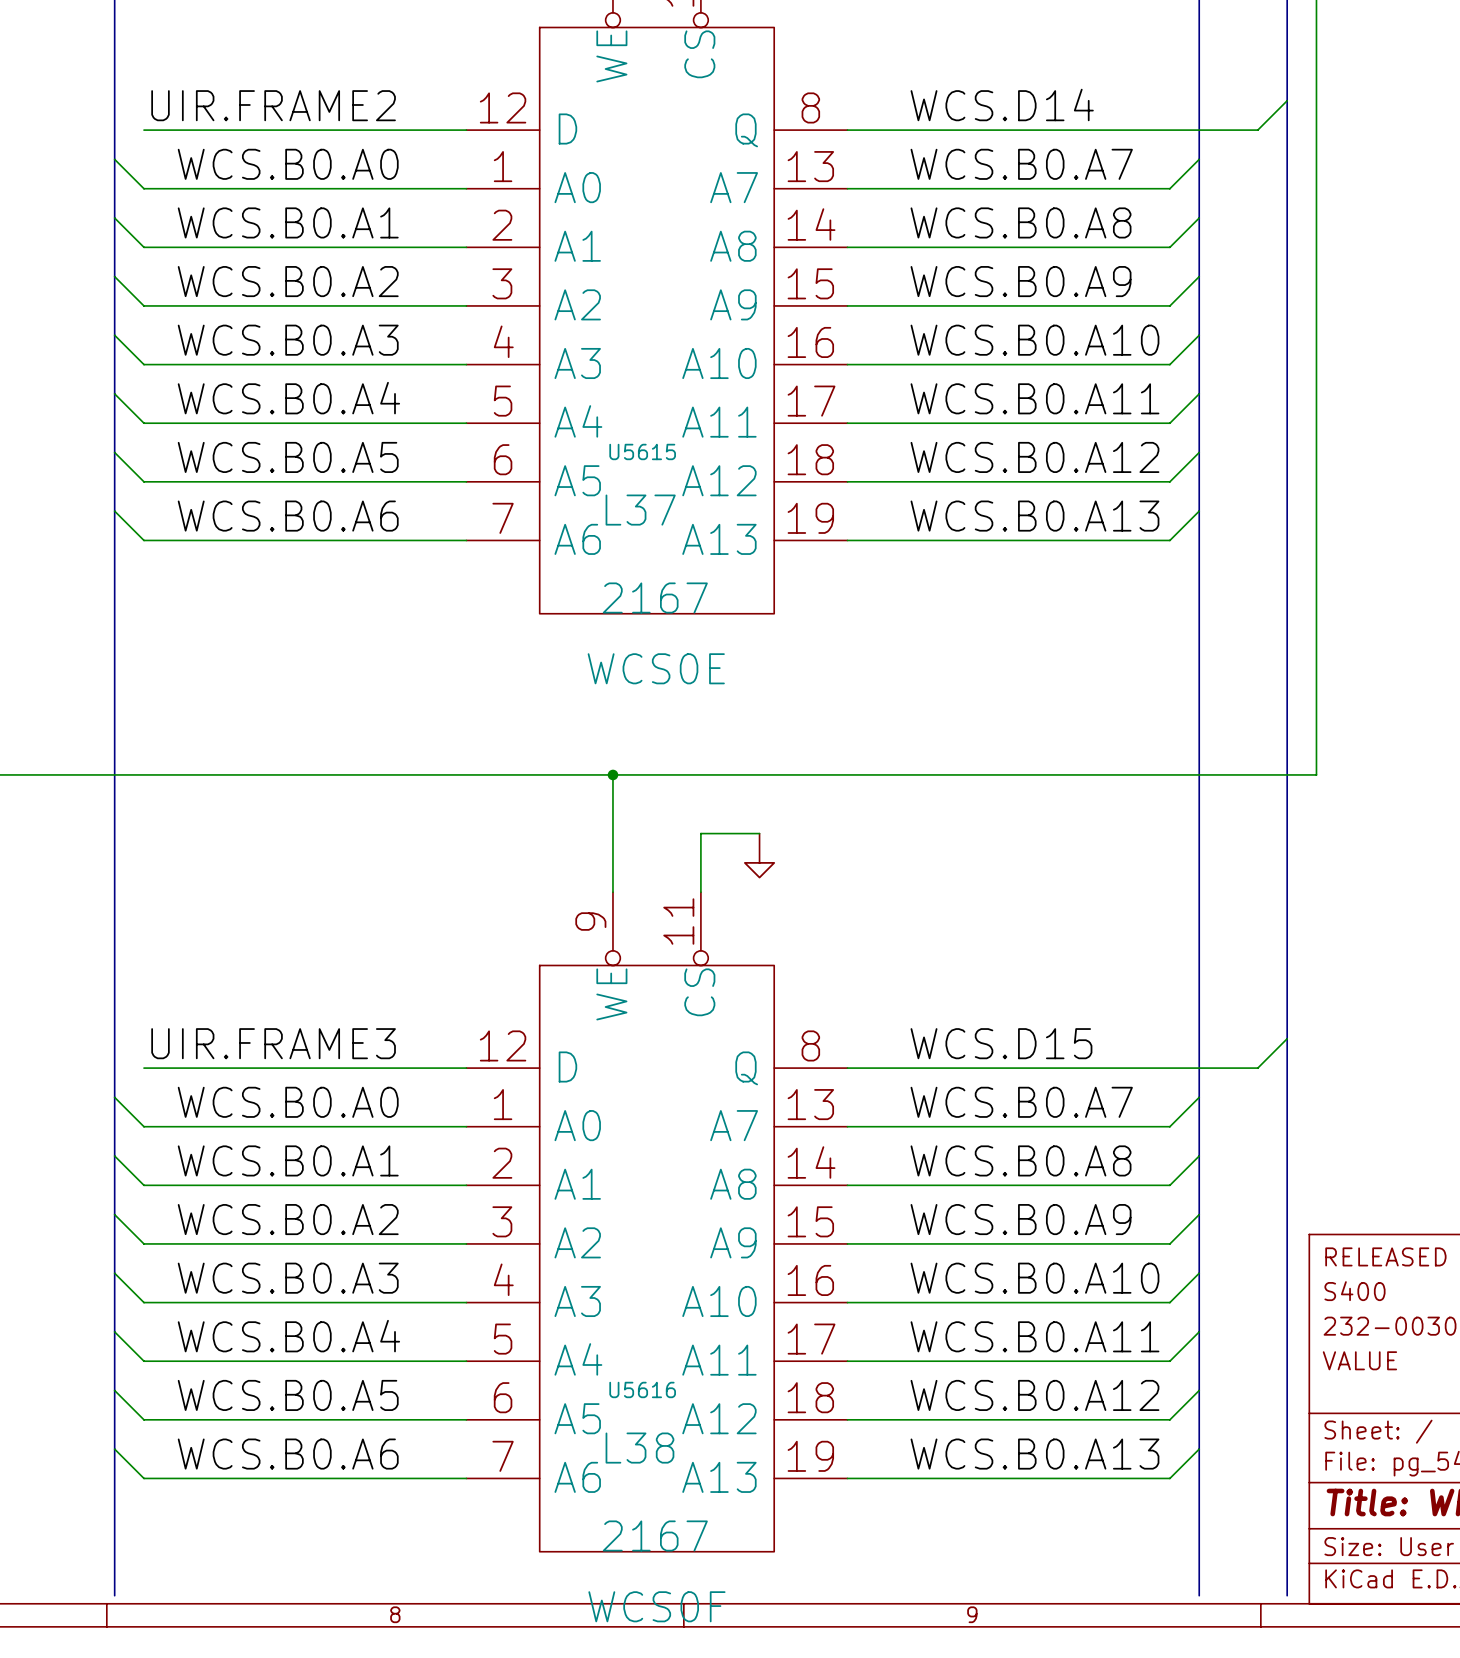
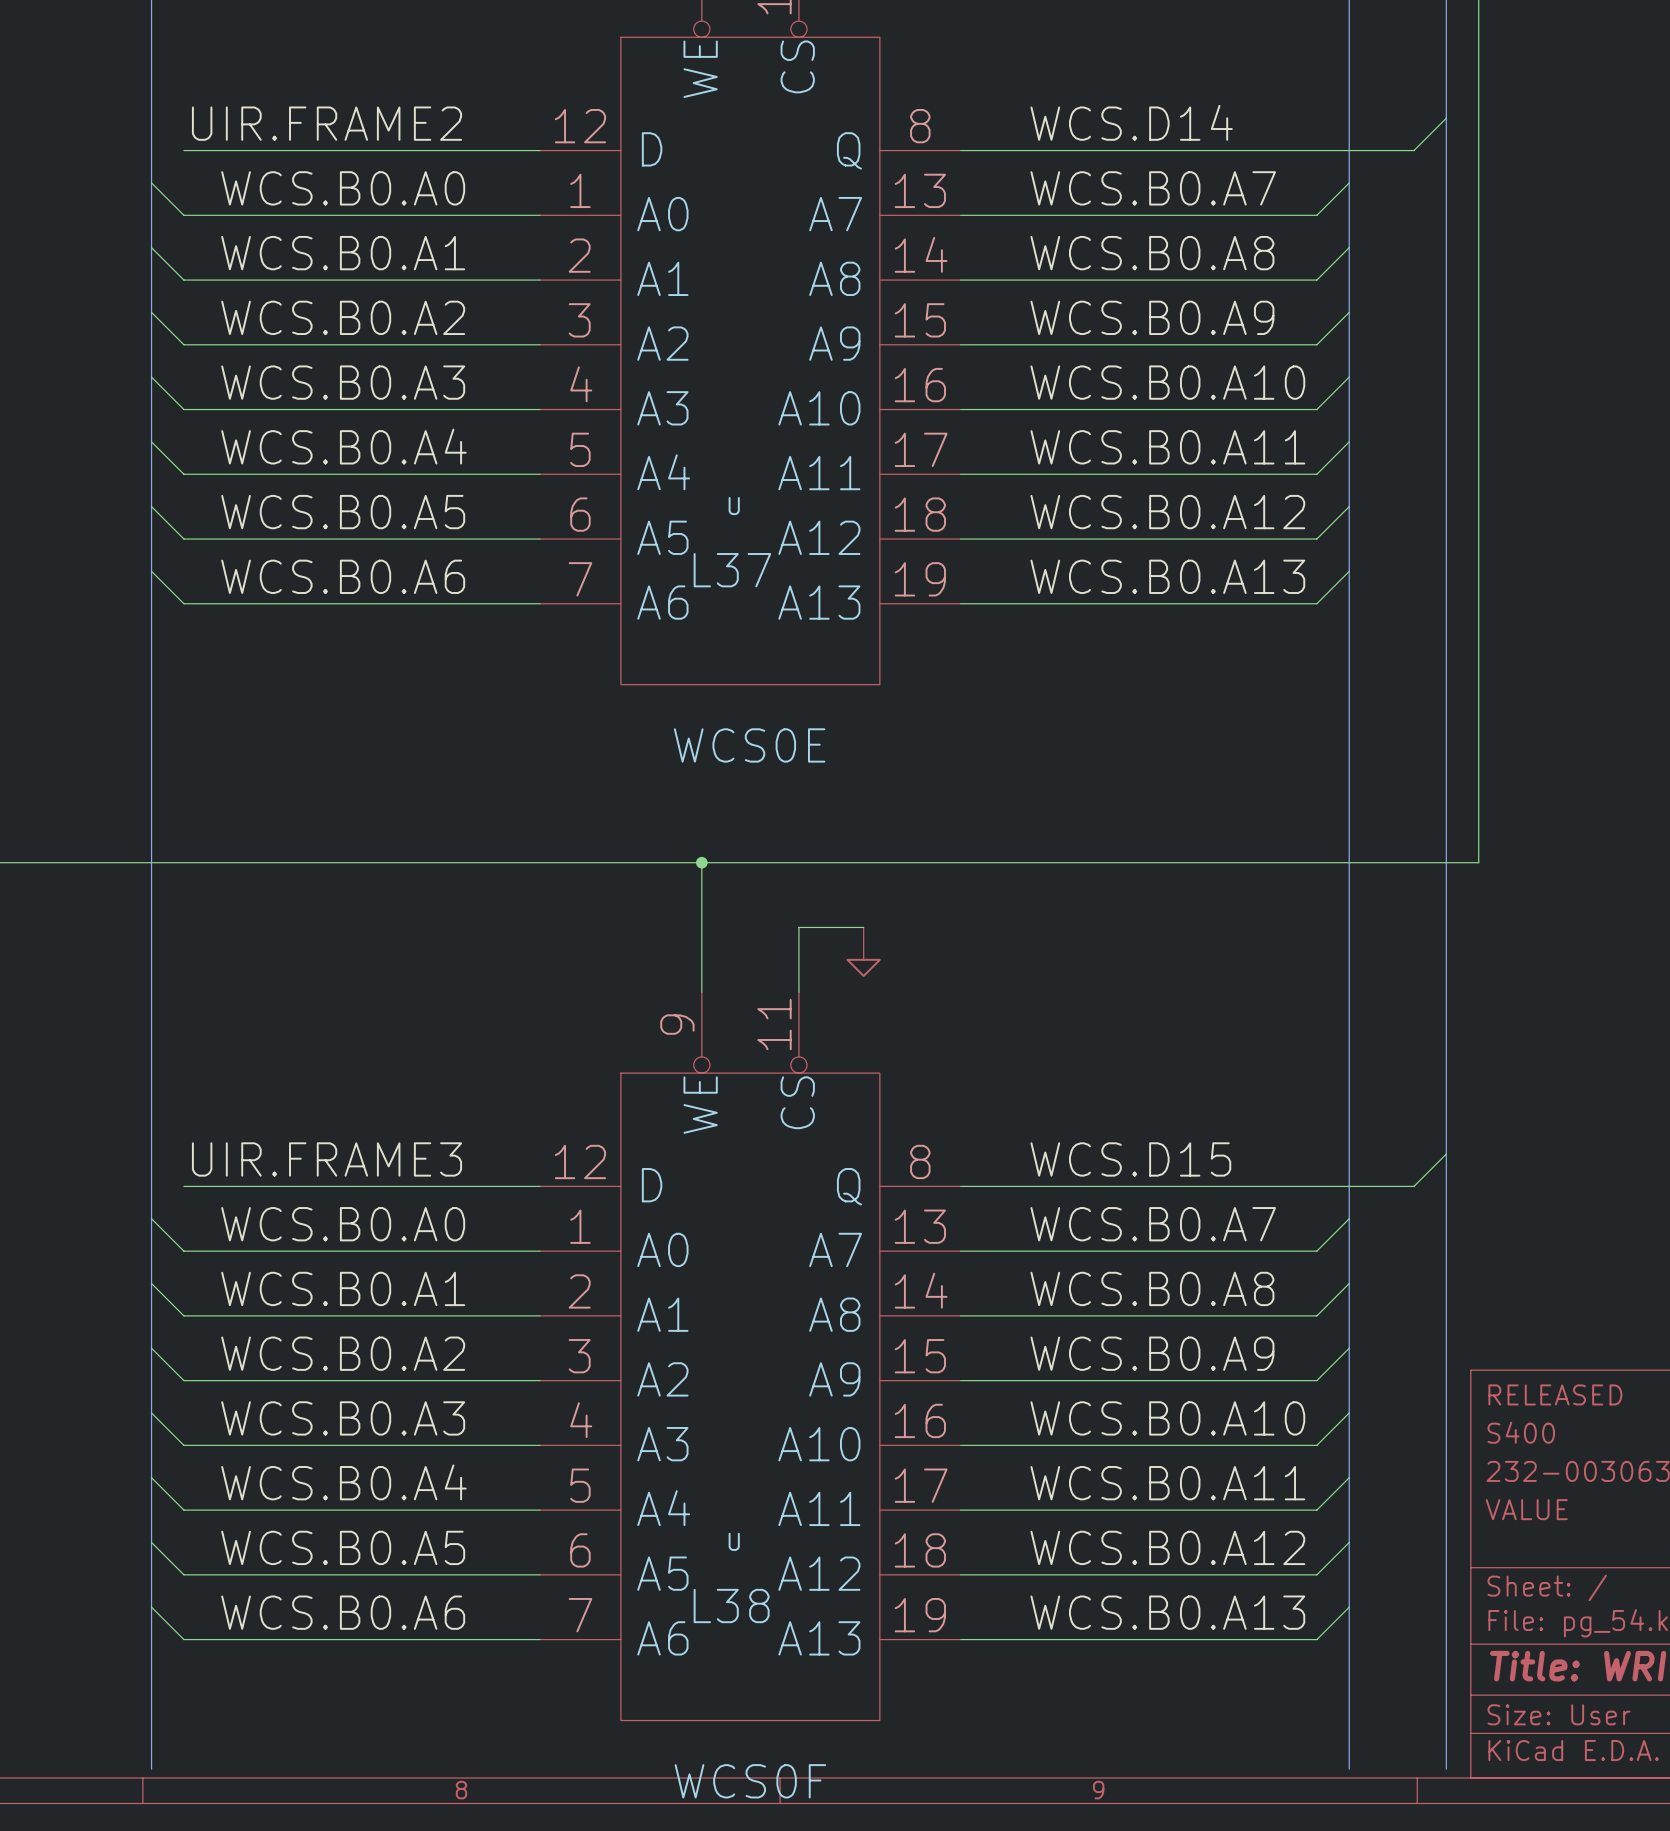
U5615 name: U5615 (642, 451) -> U (734, 506)
U5615 value: 2167 (655, 597) -> none
U5616 name: U5616 (642, 1389) -> U (734, 1541)
U5616 value: 2167 (655, 1535) -> none

